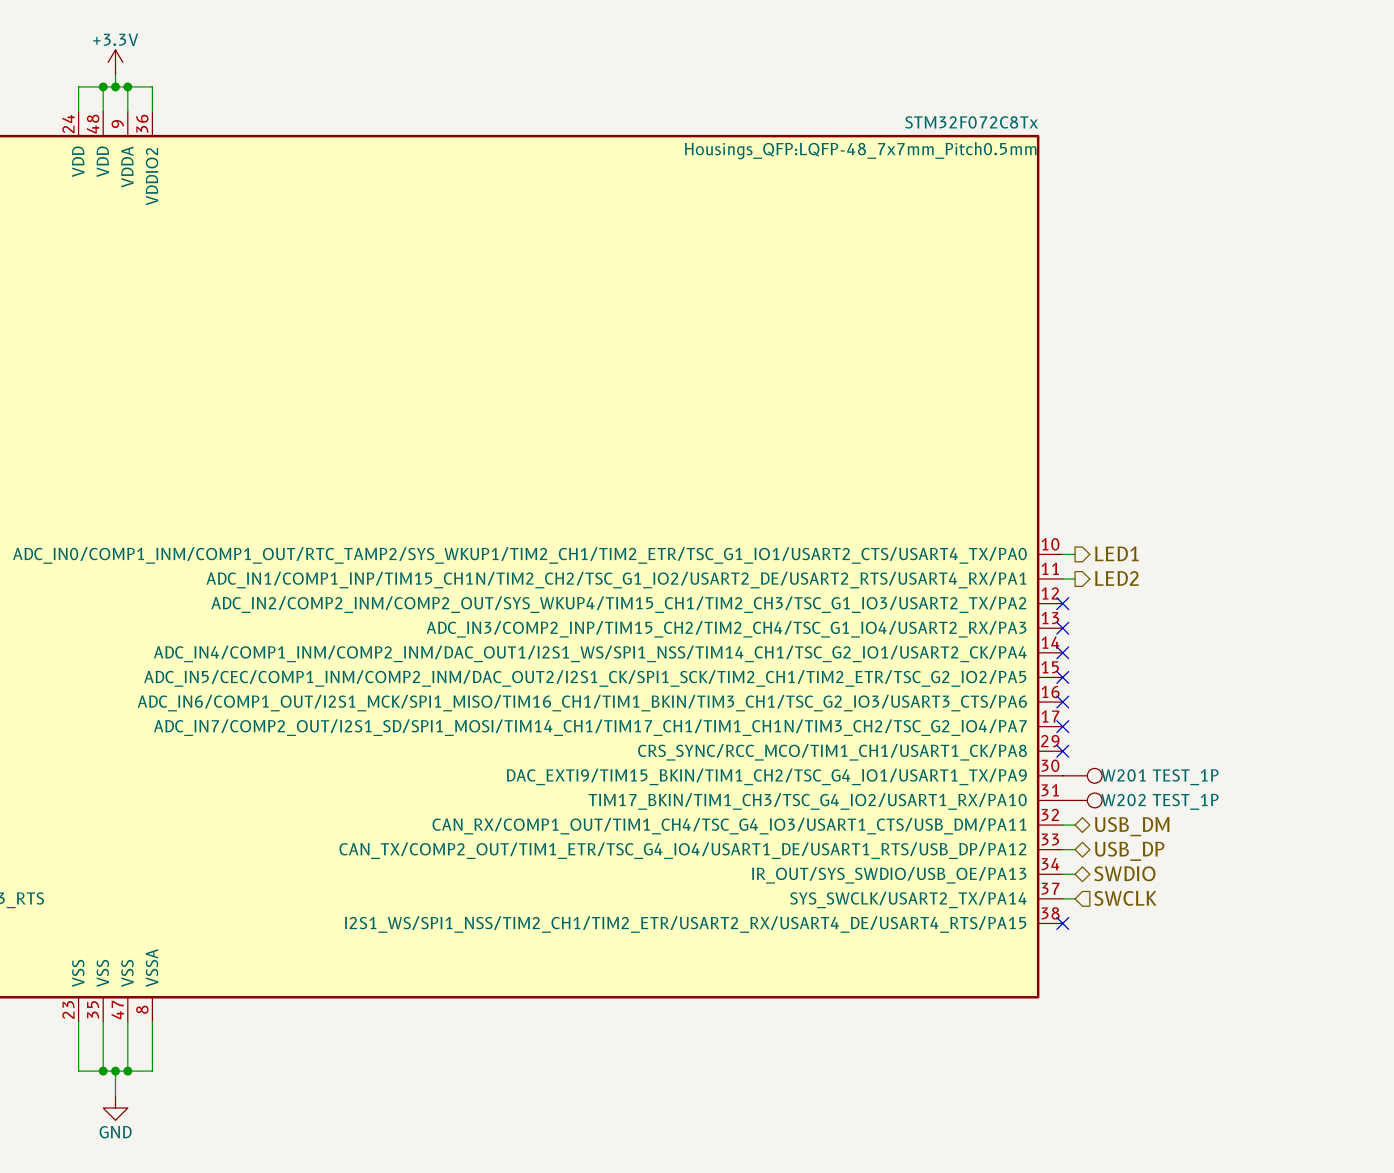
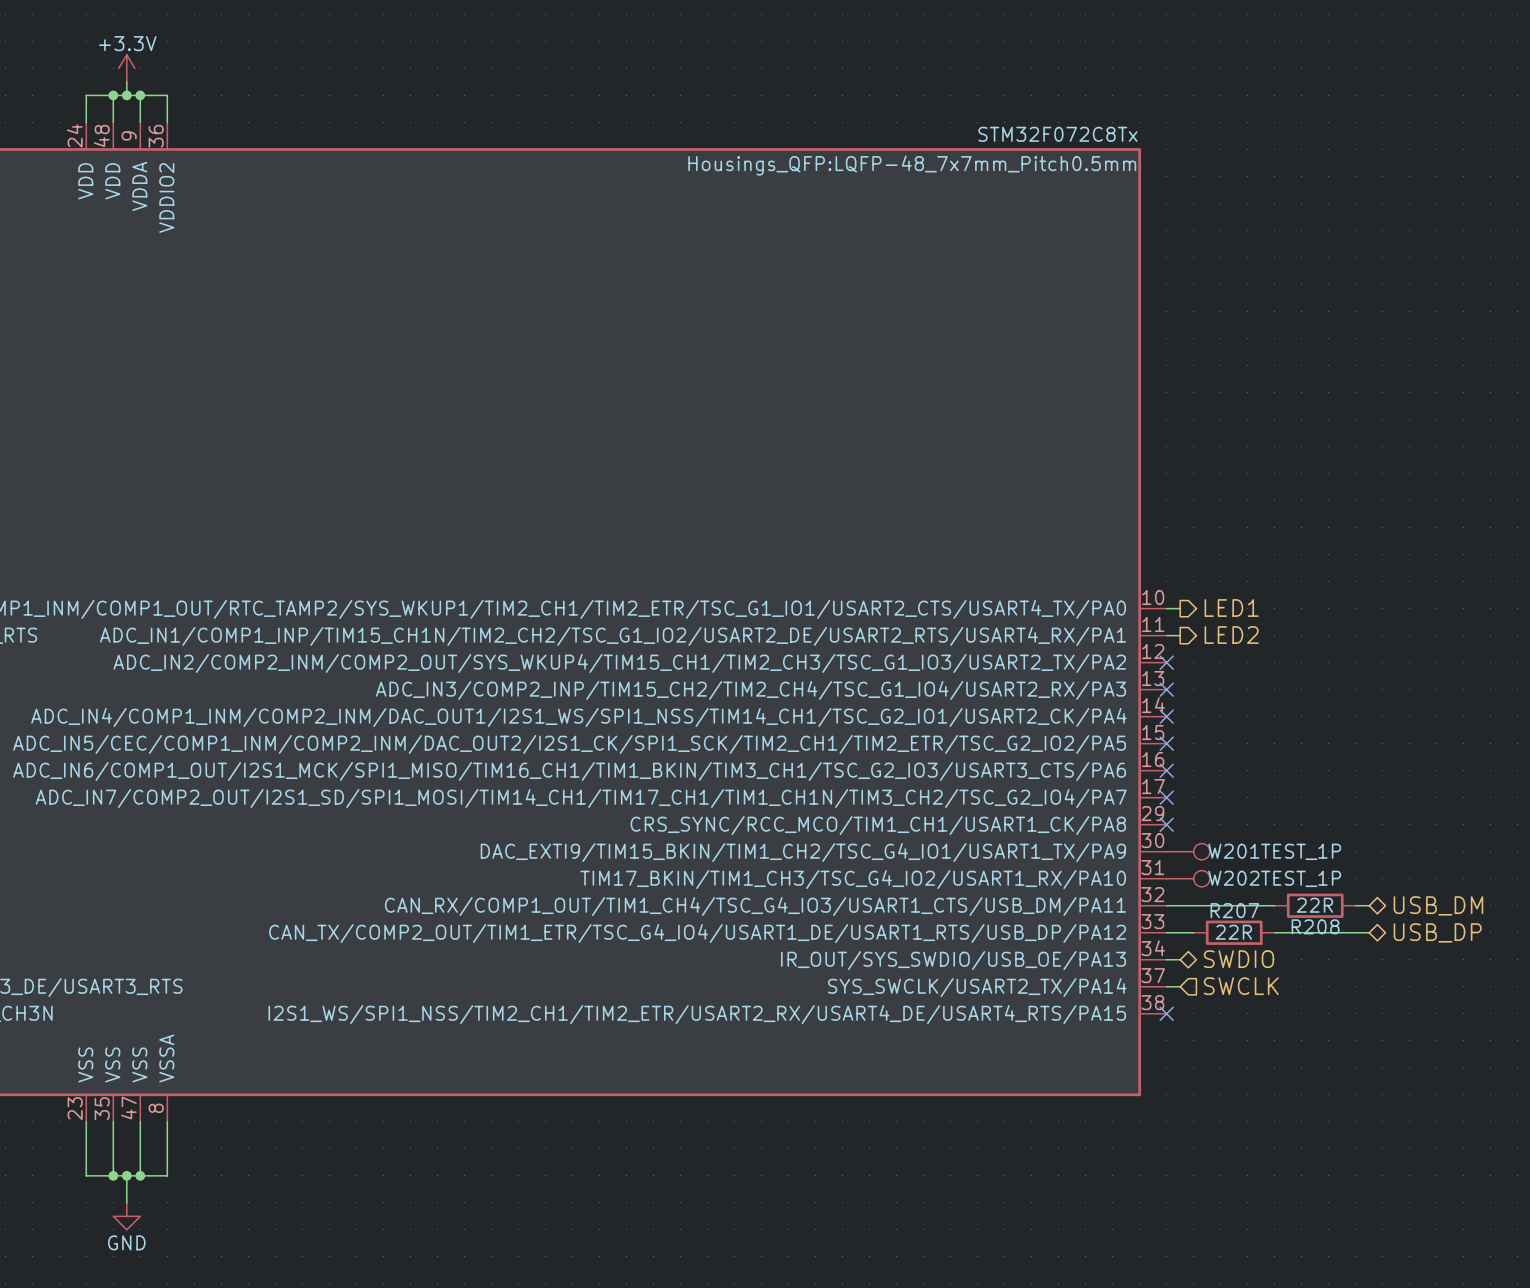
wire: none -> (1180, 905) (1274, 905)
R208: none -> 22R (1315, 905)
wire: none -> (1355, 905) (1369, 905)
hierarchical label position: USB_DM (1132, 826) -> USB_DM (1438, 905)
wire: none -> (1180, 932) (1193, 932)
R207: none -> 22R (1234, 932)
wire: none -> (1274, 932) (1369, 932)
hierarchical label position: USB_DP (1129, 851) -> USB_DP (1437, 932)

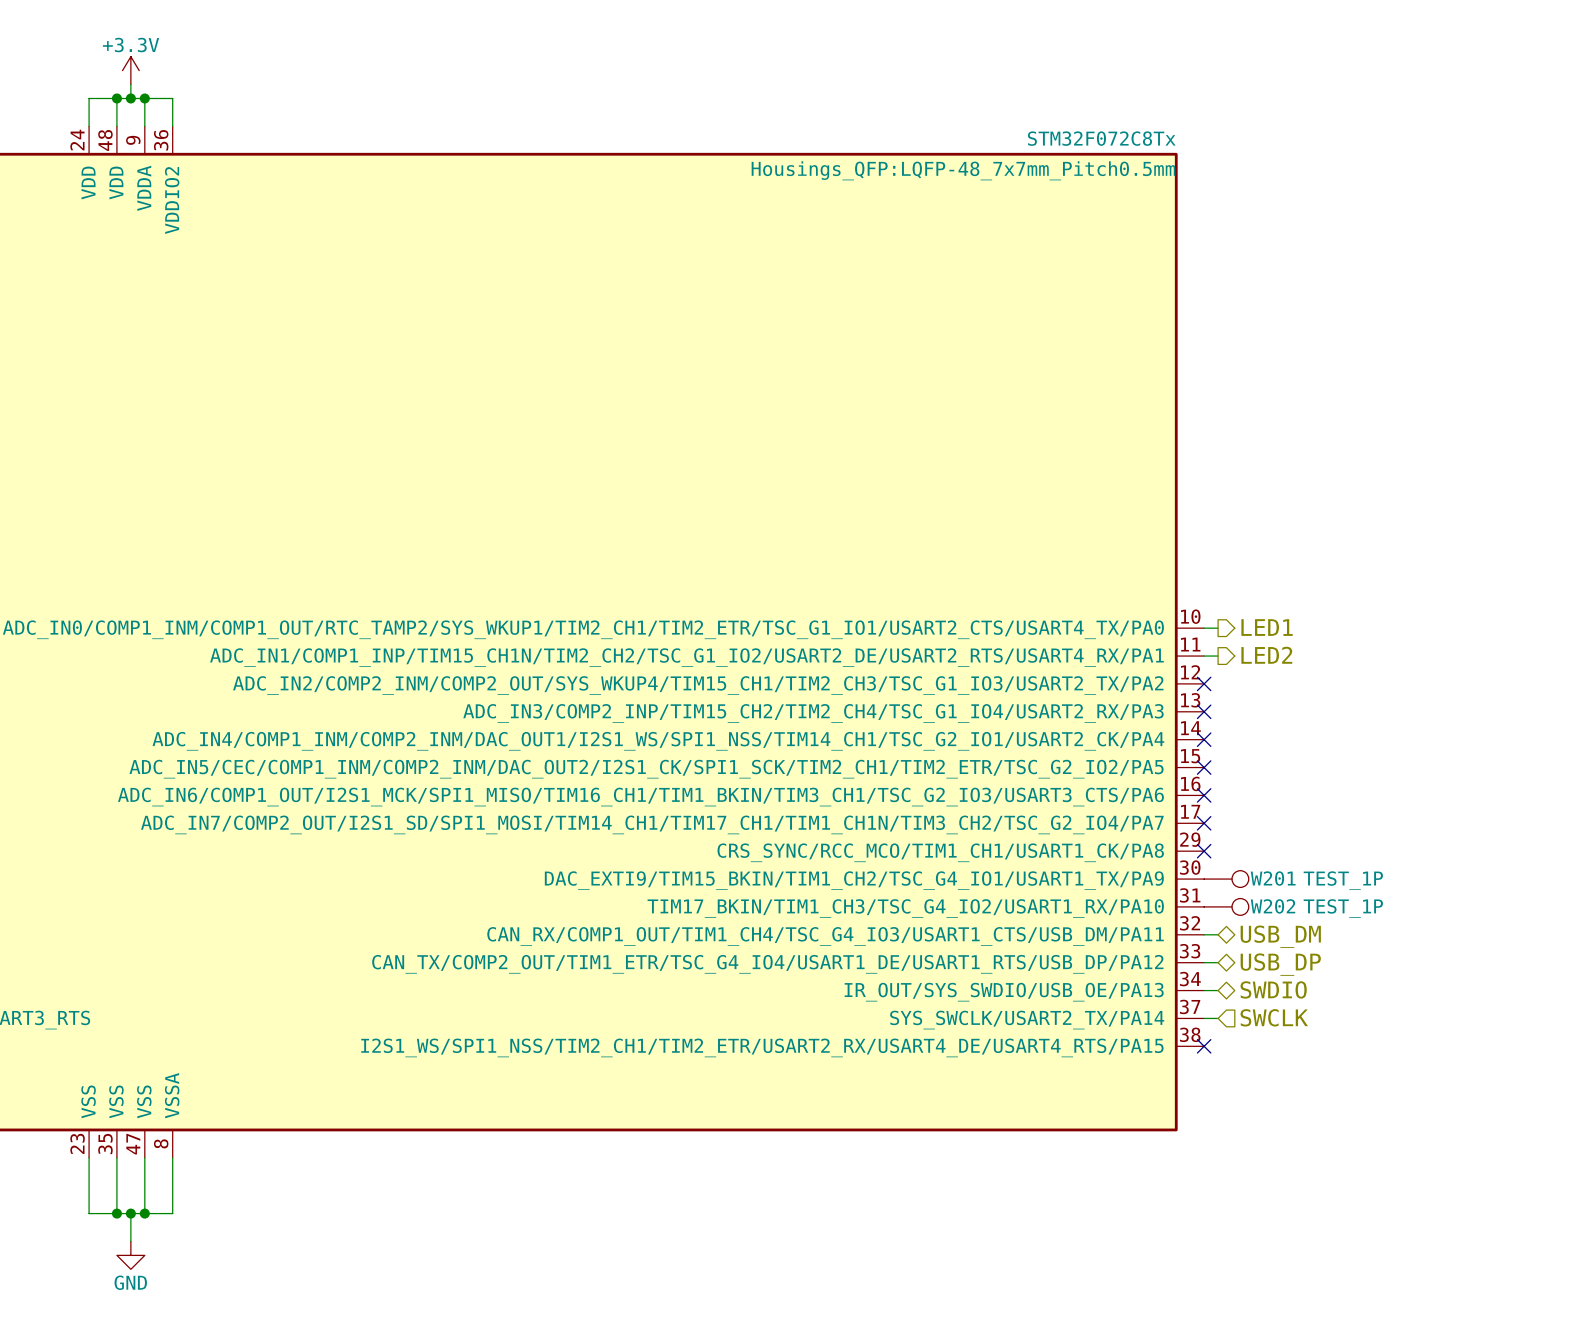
wire: (1180, 905) (1274, 905) -> none
R208: 22R (1315, 905) -> none
wire: (1355, 905) (1369, 905) -> none
hierarchical label position: USB_DM (1438, 905) -> USB_DM (1280, 936)
wire: (1180, 932) (1193, 932) -> none
R207: 22R (1234, 932) -> none
wire: (1274, 932) (1369, 932) -> none
hierarchical label position: USB_DP (1437, 932) -> USB_DP (1280, 964)

